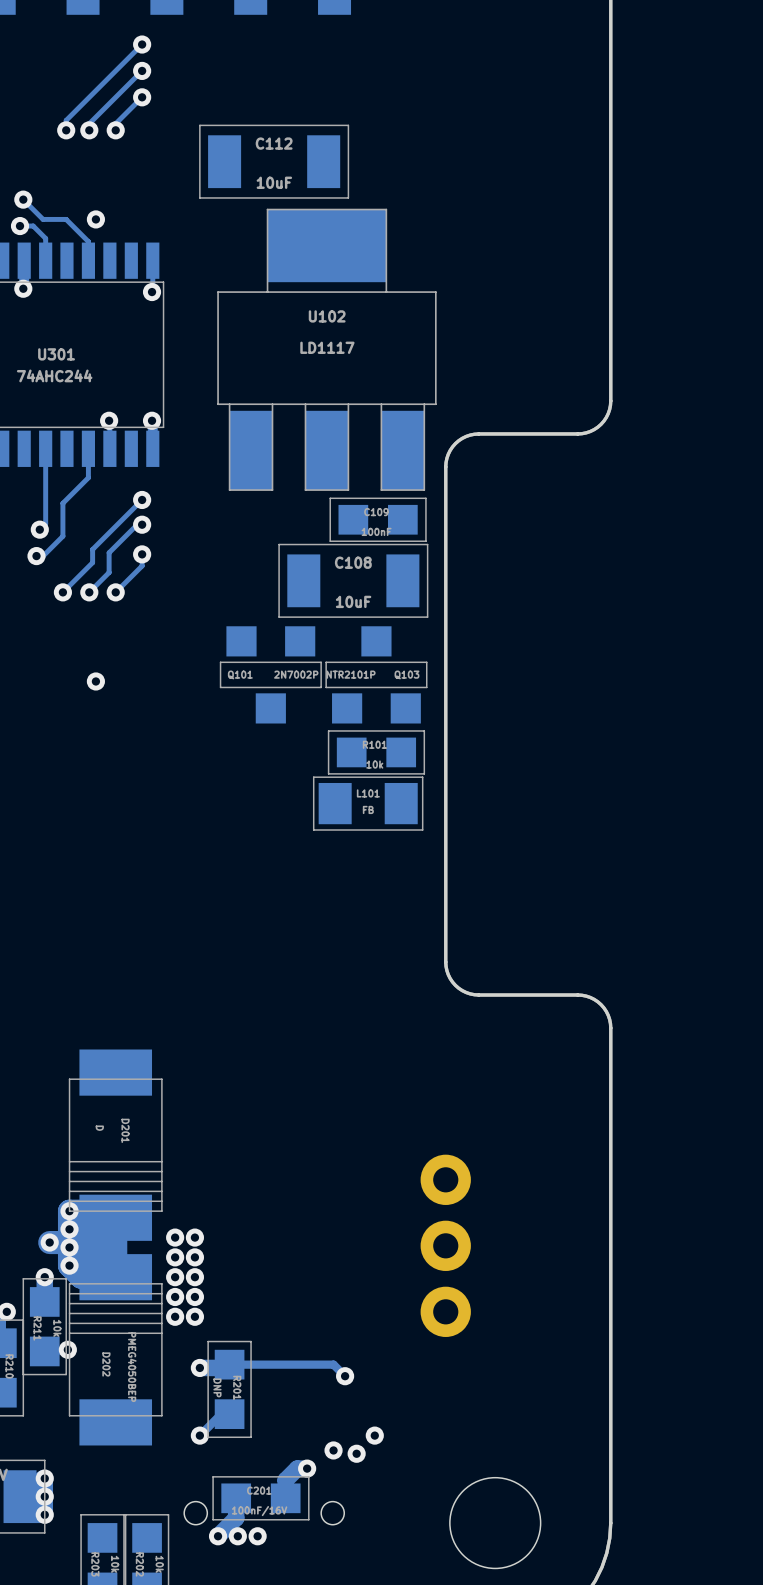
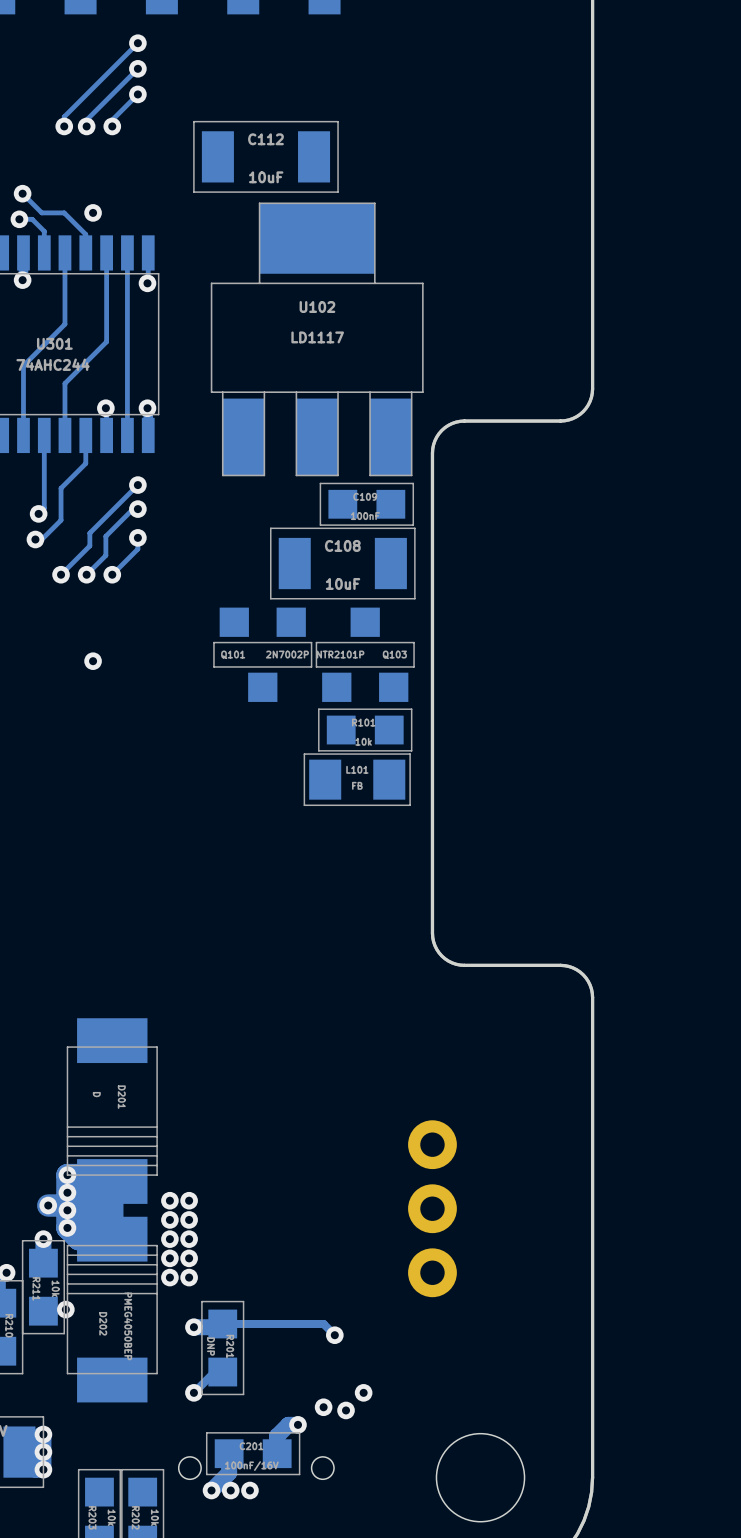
track: none -> (64, 252) (64, 324) (23, 365) (23, 435)
track: none -> (106, 252) (106, 341) (64, 383) (64, 435)
track: none -> (127, 252) (127, 435)

